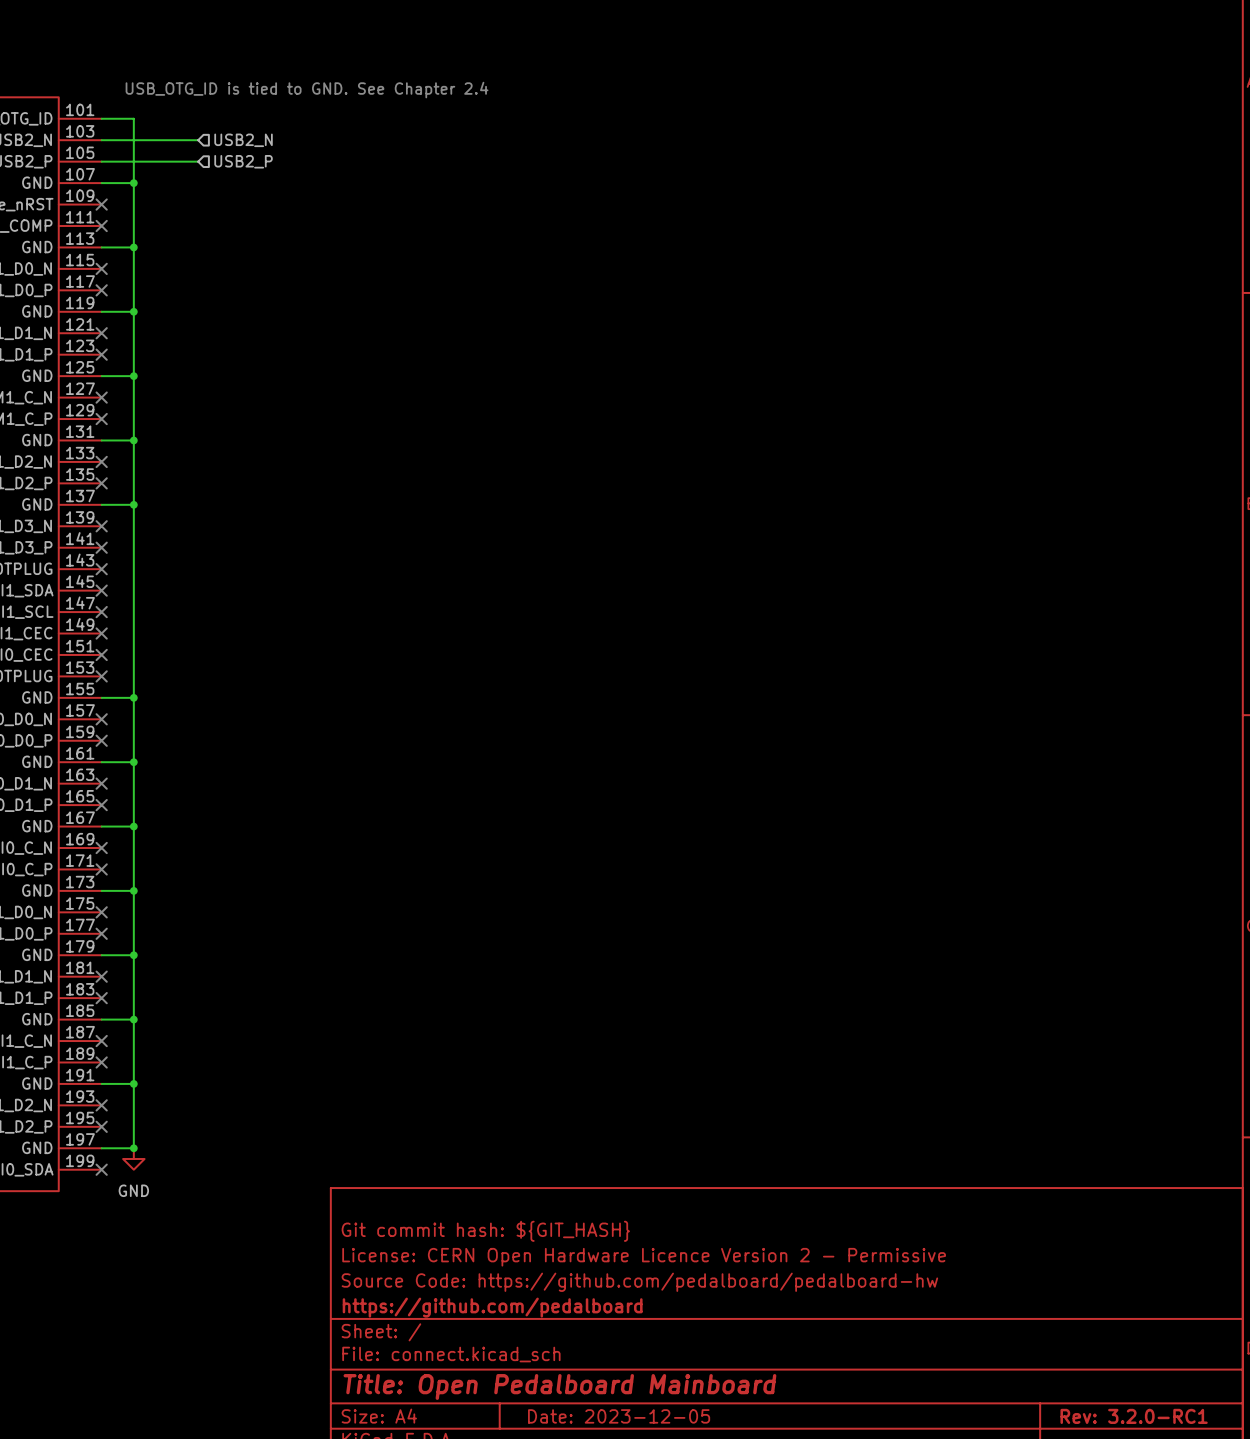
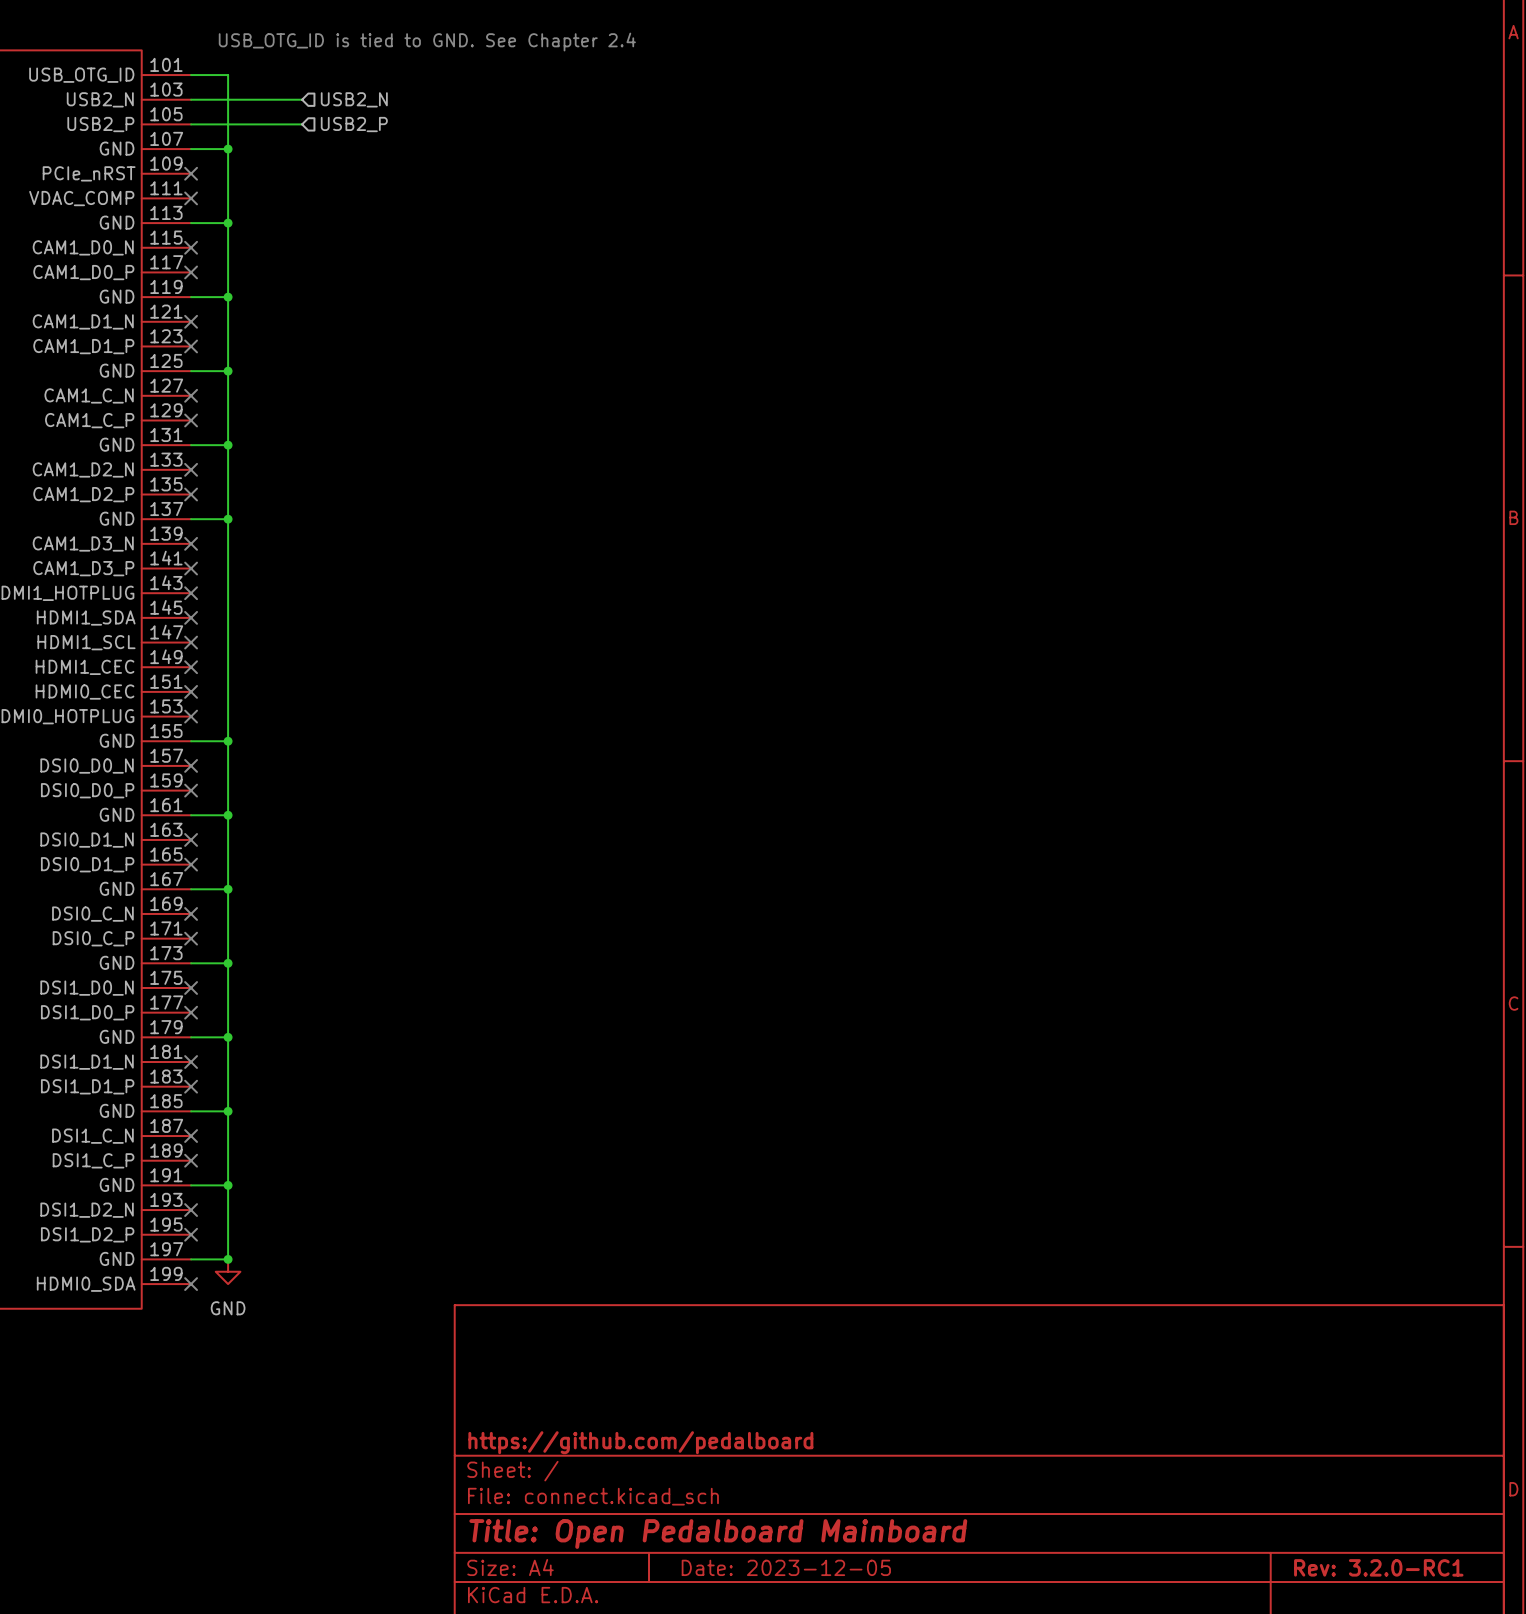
title block: Git commit hash: ${GIT_HASH} (485, 1231) -> none
title block: License: CERN Open Hardware Licence Version 2 - Permissive (644, 1257) -> none
title block: Source Code: https://github.com/pedalboard/pedalboard-hw (639, 1282) -> none

